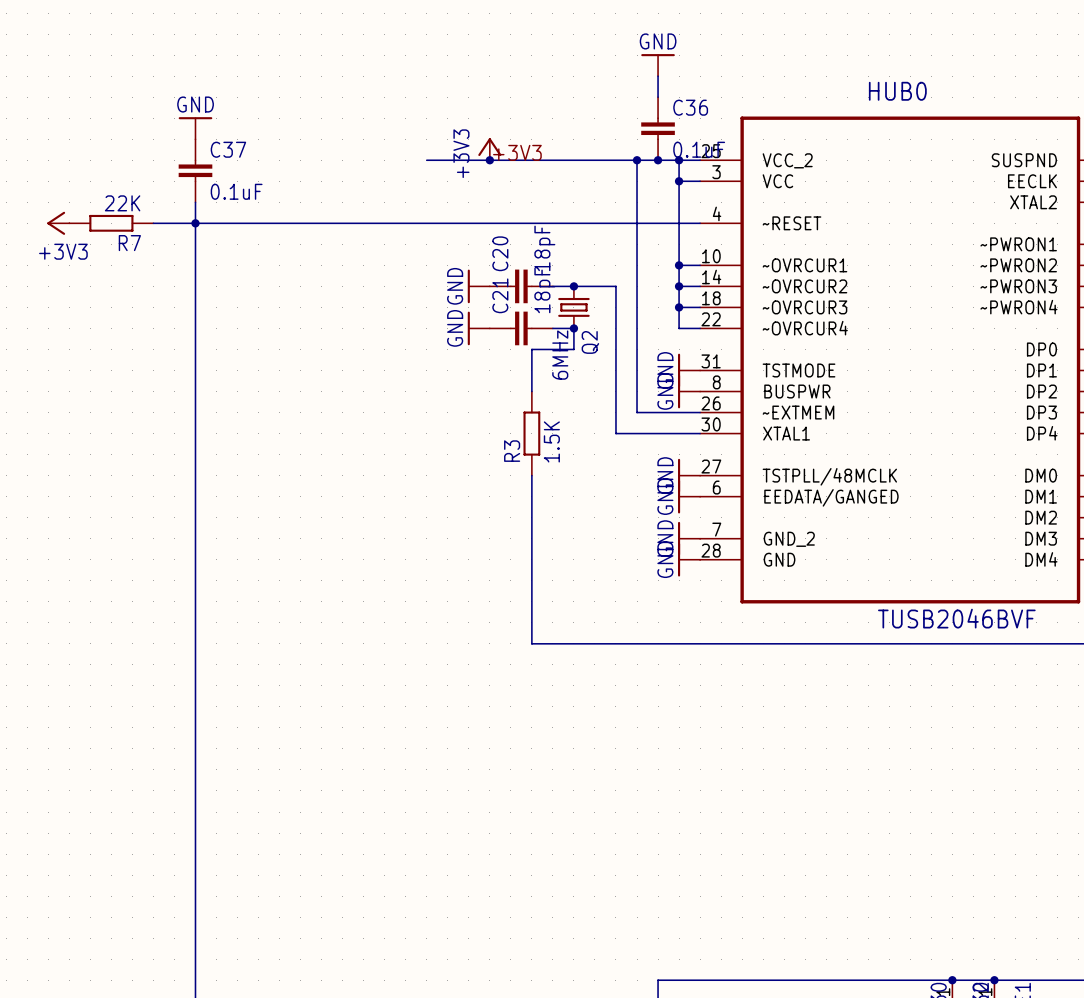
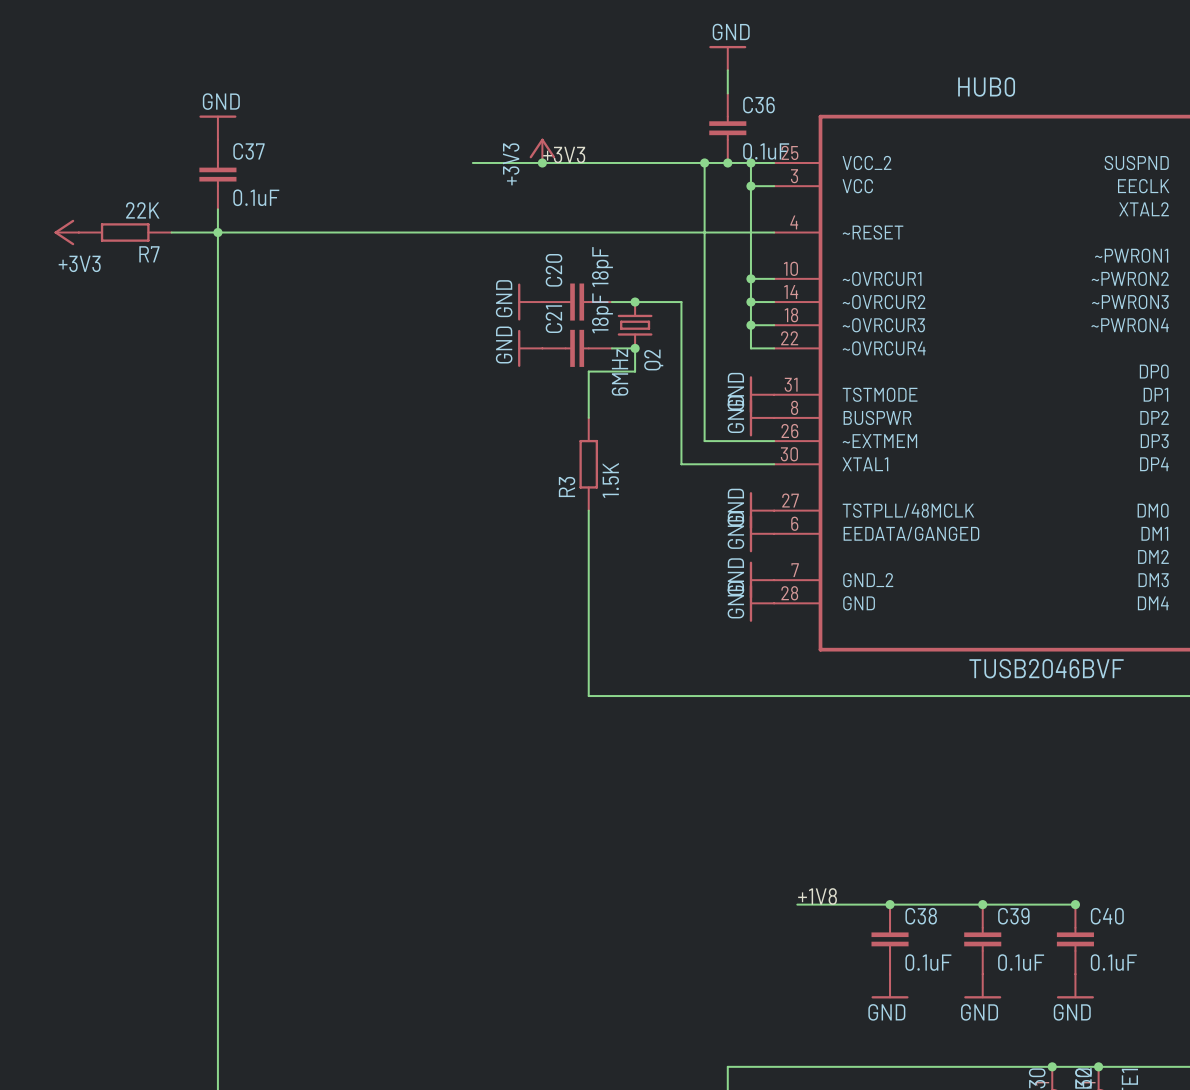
label: none -> +1V8 (817, 896)
wire: none -> (797, 904) (1075, 904)
junction: none -> (890, 904)
junction: none -> (982, 904)
junction: none -> (1075, 904)
C38: none -> 0.1uF (890, 939)
C39: none -> 0.1uF (982, 939)
C40: none -> 0.1uF (1075, 939)
power symbol: none -> GND (890, 986)
power symbol: none -> GND (982, 986)
power symbol: none -> GND (1075, 986)

